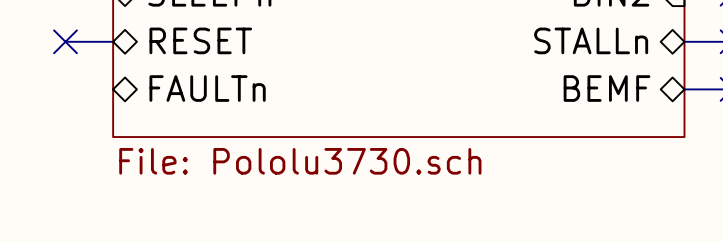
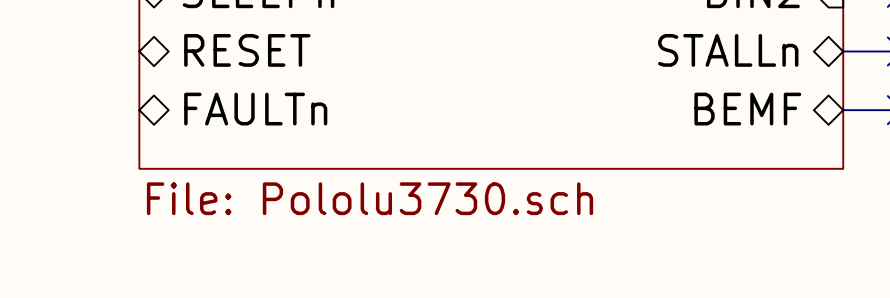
wire: (65, 41) (113, 41) -> none
no-connect mark: (65, 41) -> none

